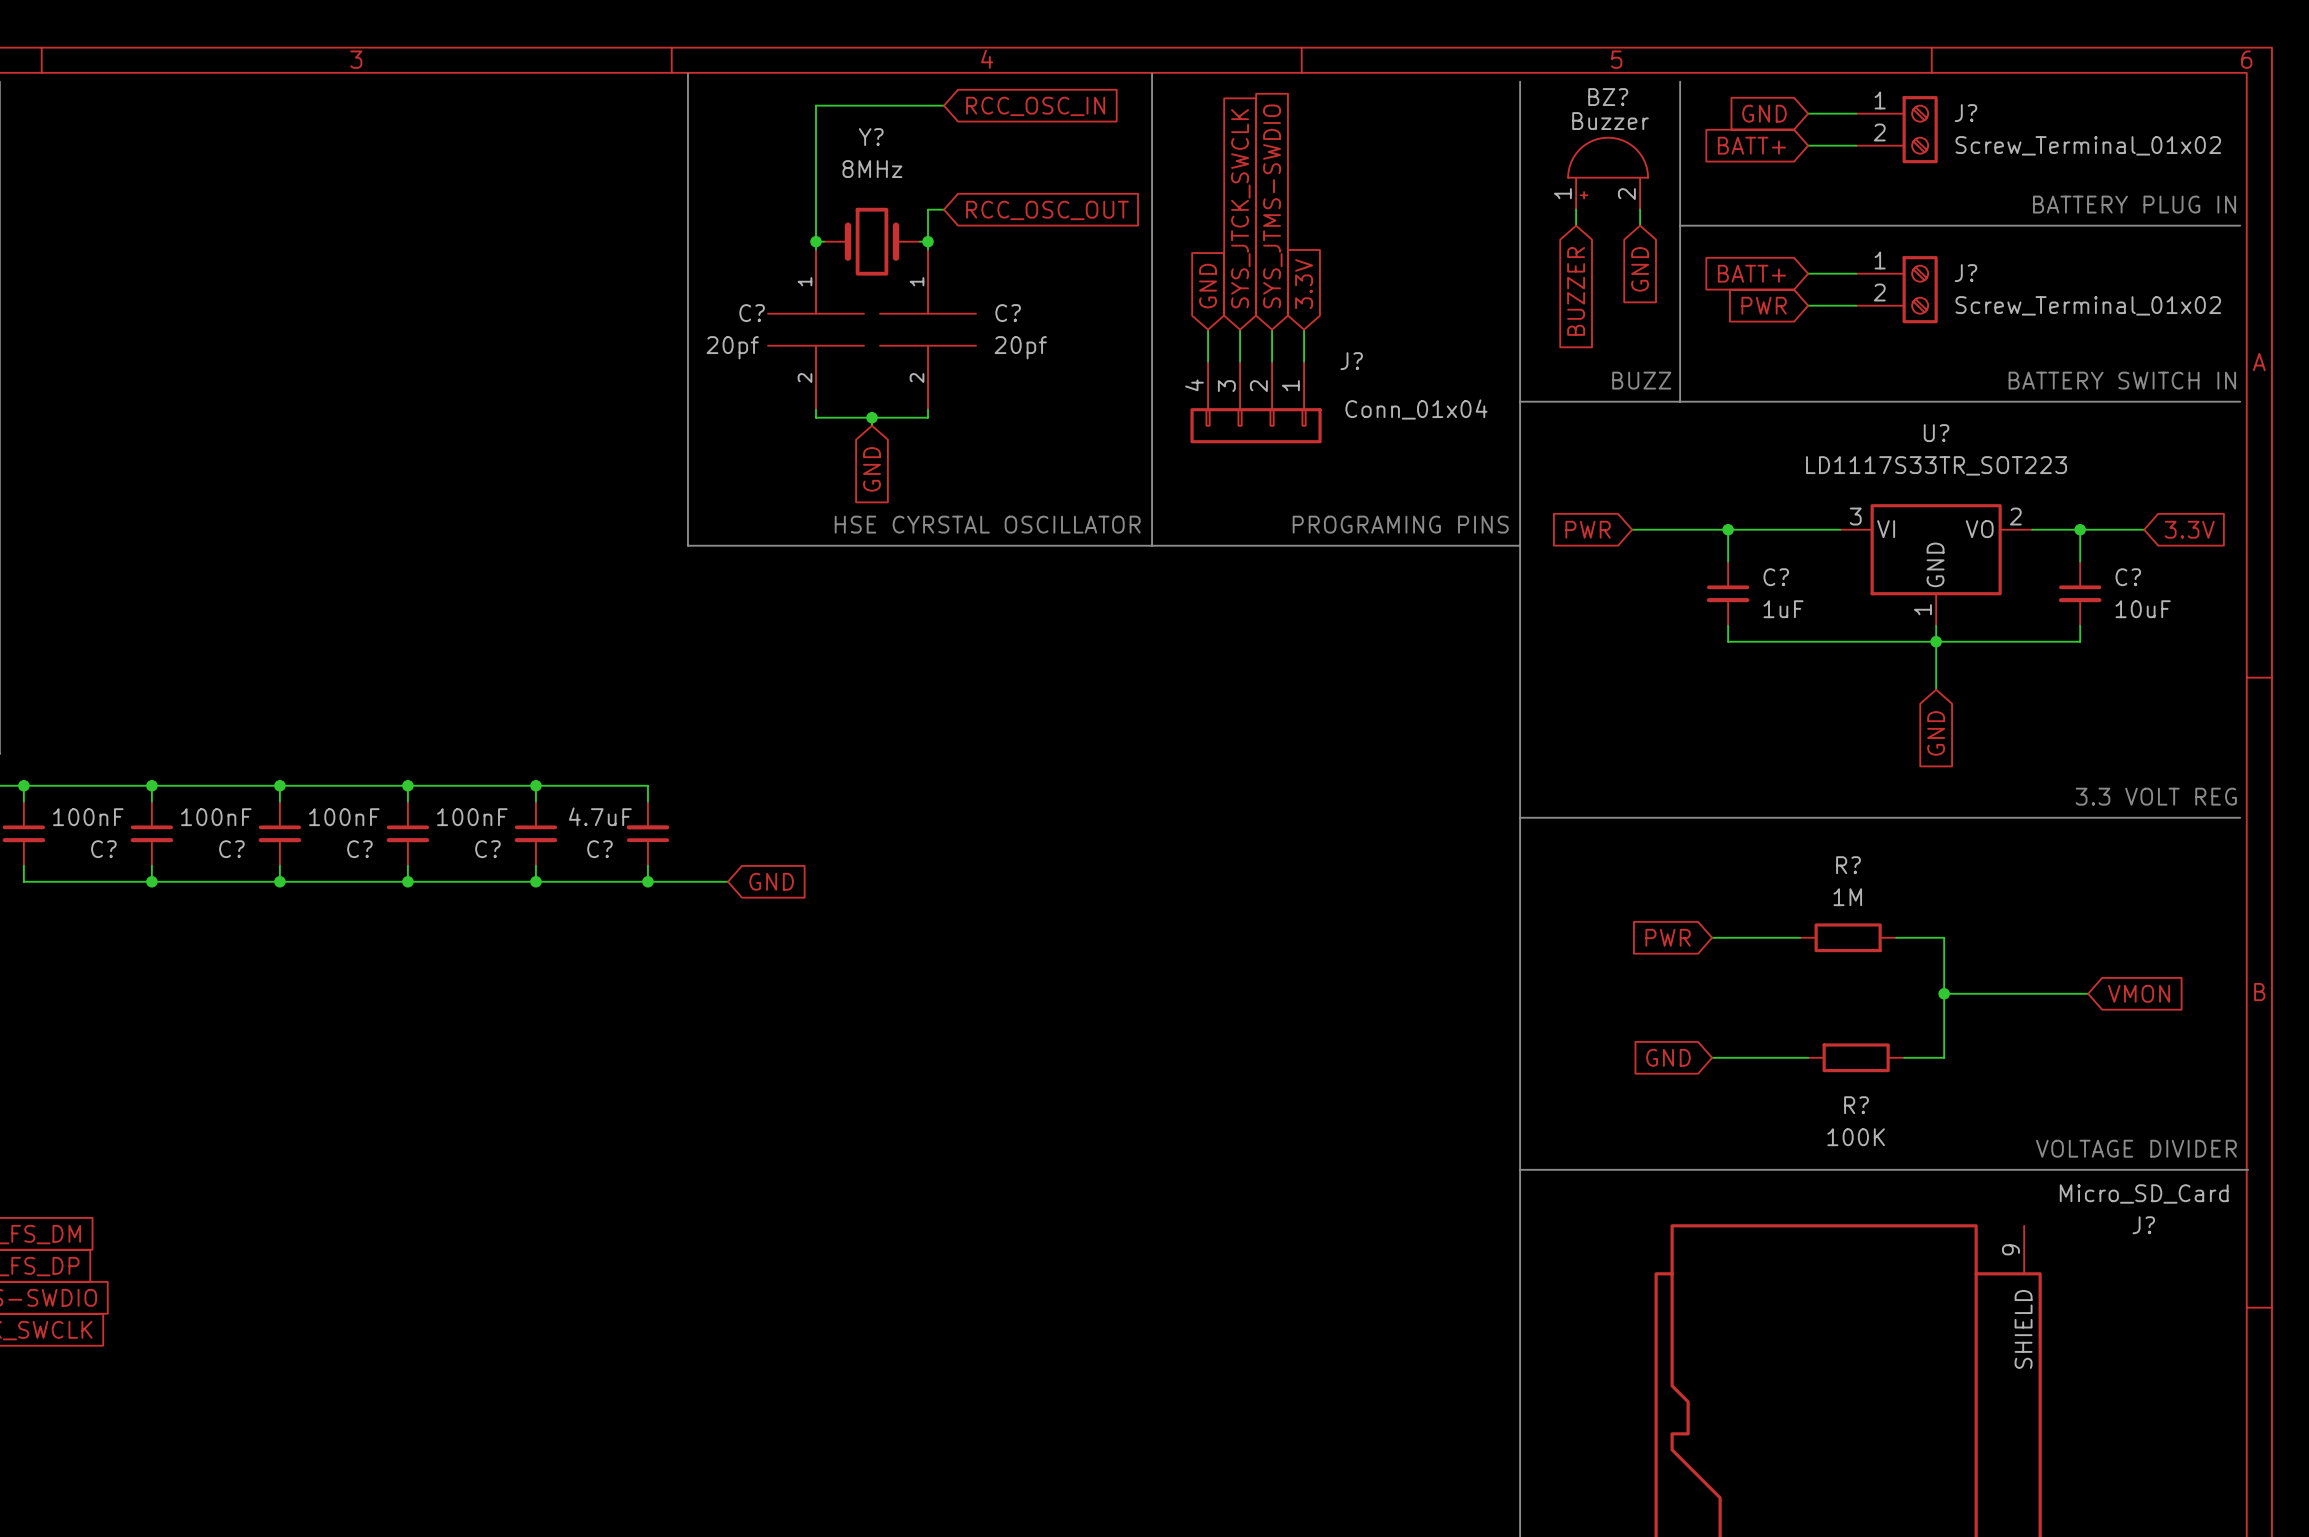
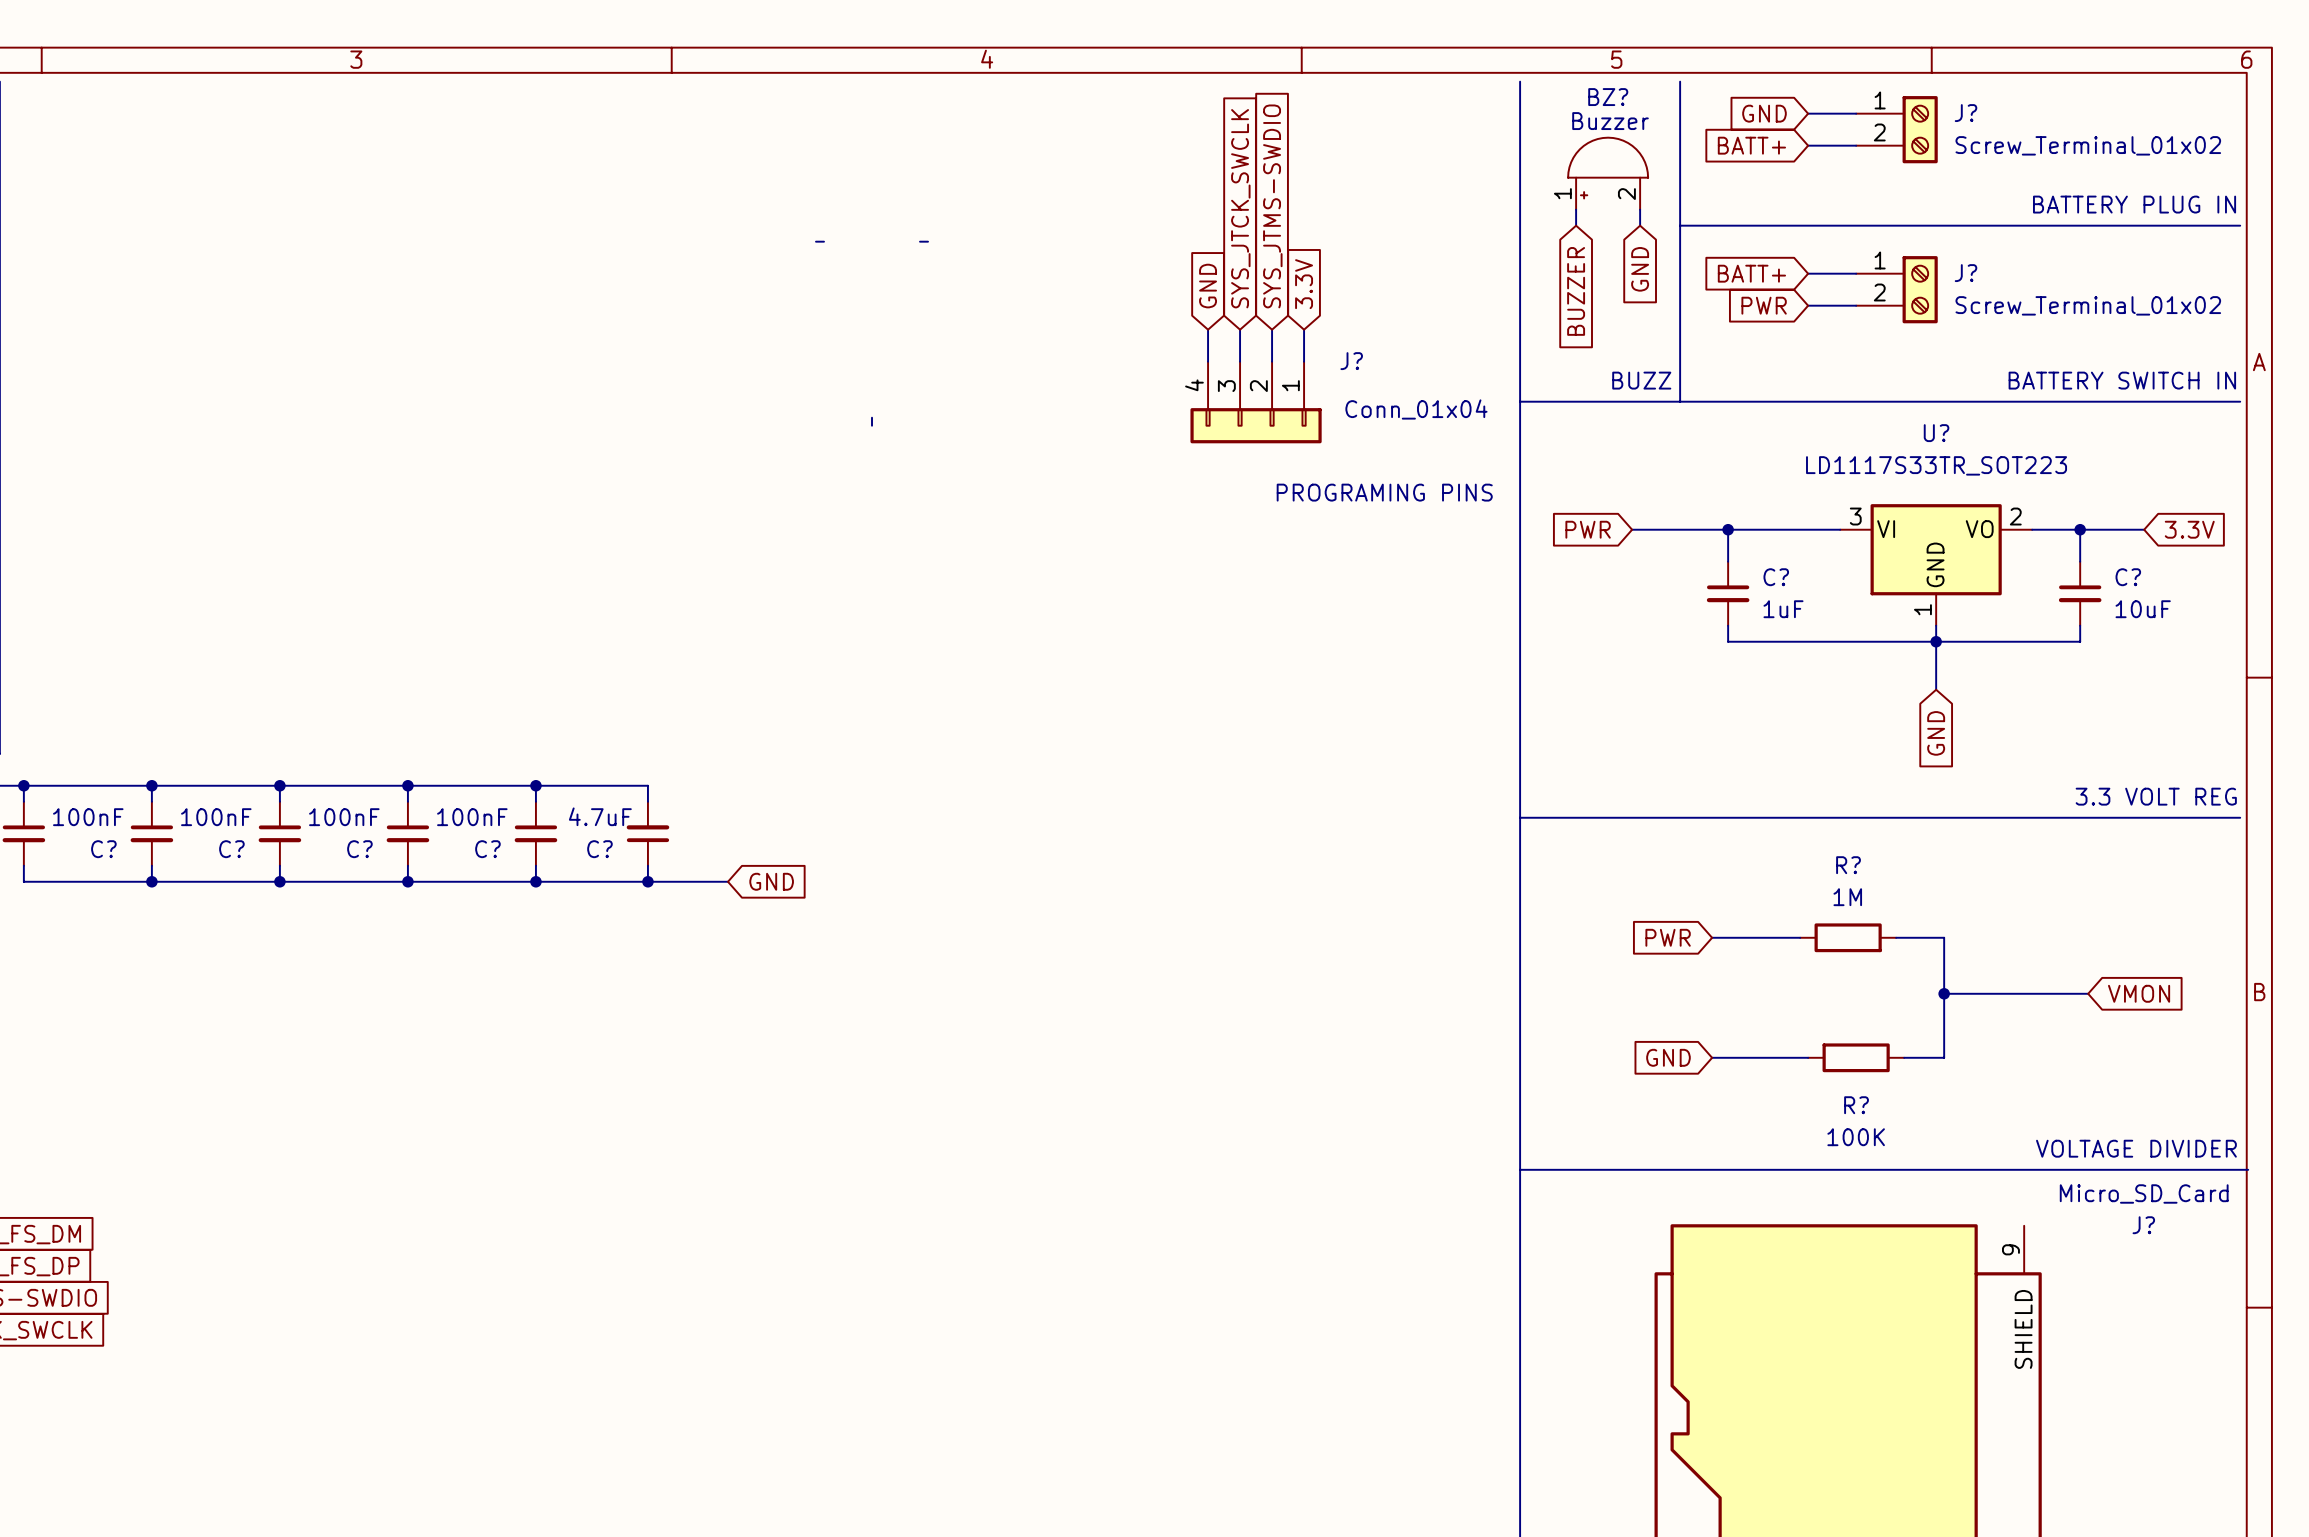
line: (687, 73) (687, 545) (1520, 545) -> none
line: (1152, 73) (1152, 545) -> none
wire: (944, 105) (815, 105) (815, 249) -> none
global label: RCC_OSC_IN (1035, 106) -> none
wire: (944, 209) (928, 209) (928, 249) -> none
global label: RCC_OSC_OUT (1047, 210) -> none
junction: (815, 241) -> none
Y?: 8MHz (872, 241) -> none
junction: (928, 241) -> none
C?: 20pf (815, 329) -> none
C?: 20pf (928, 329) -> none
wire: (815, 409) (815, 417) (928, 417) (928, 409) -> none
junction: (872, 417) -> none
global label: GND (872, 469) -> none
text: HSE CYRSTAL OSCILLATOR (987, 524) -> none
text position: PROGRAMING PINS (1400, 524) -> PROGRAMING PINS (1384, 492)

